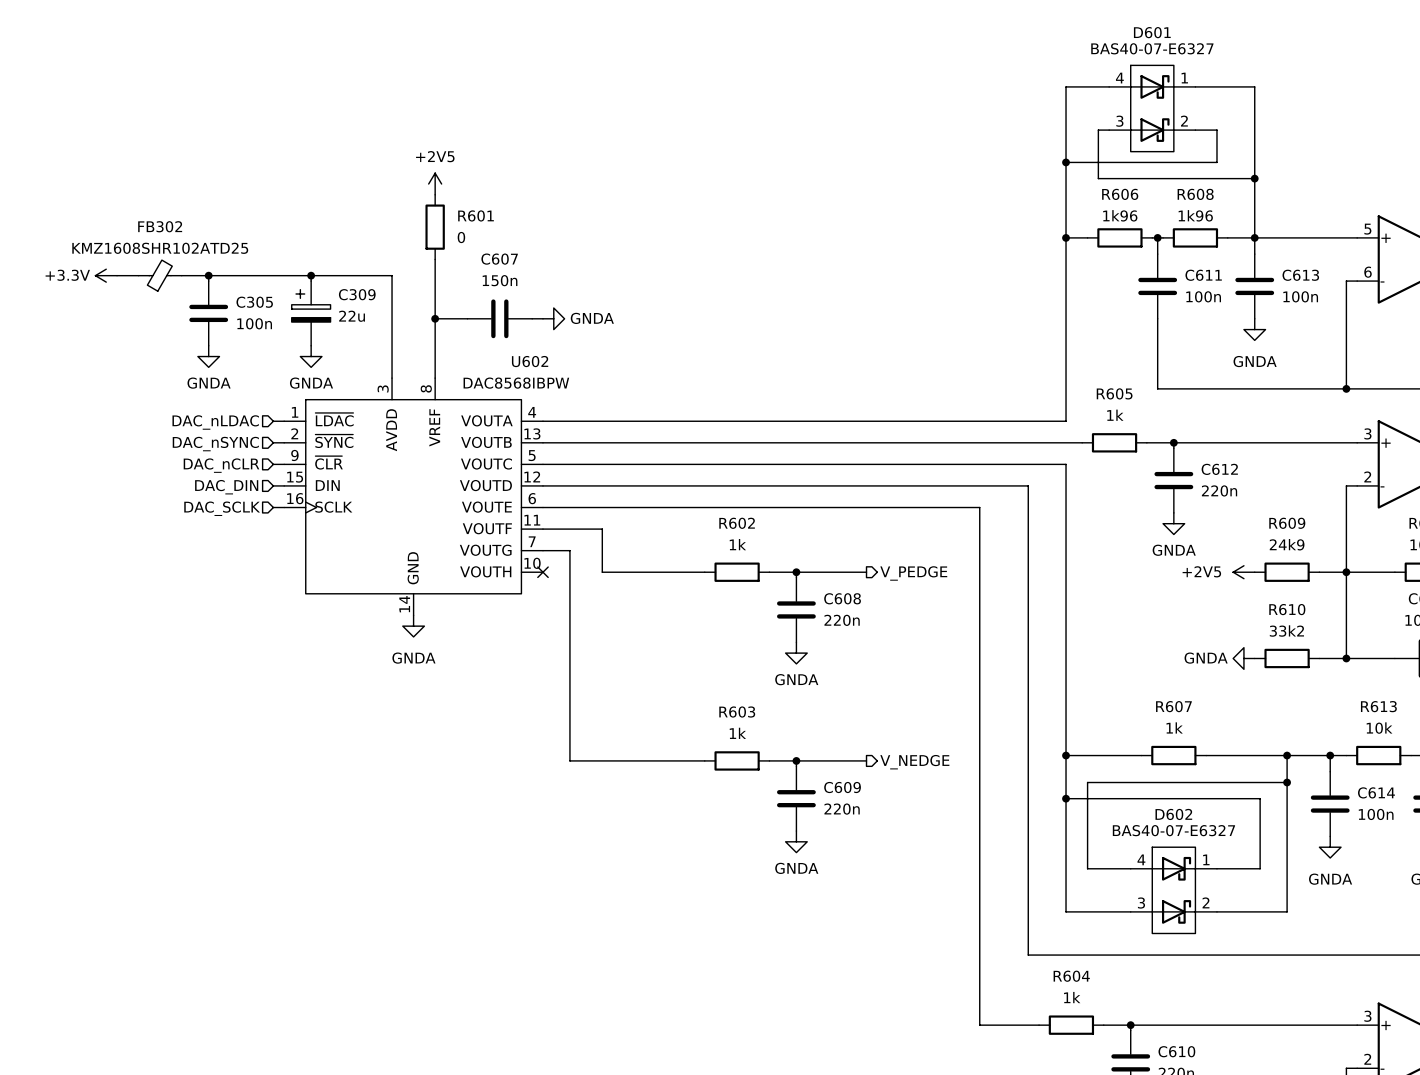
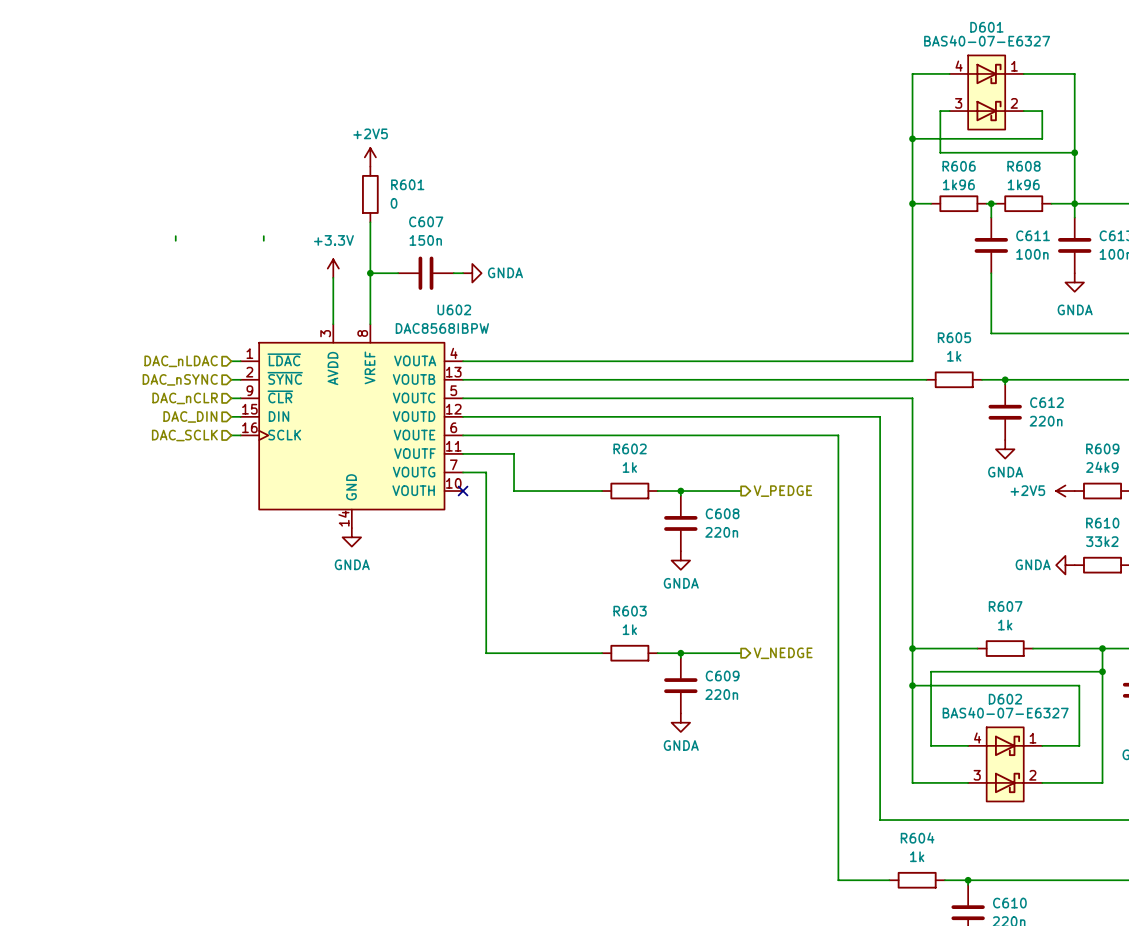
power symbol: +3.3V (106, 275) -> none
wire: (117, 275) (138, 275) -> none
FB302: KMZ1608SHR102ATD25 (160, 275) -> none
wire: (181, 275) (392, 275) (392, 324) -> none
junction: (208, 275) -> none
junction: (311, 275) -> none
C305: 100n (208, 313) -> none
C309: 22u (311, 313) -> none
power symbol: none -> +3.3V (333, 268)
power symbol: GNDA (208, 356) -> none
power symbol: GNDA (311, 356) -> none

